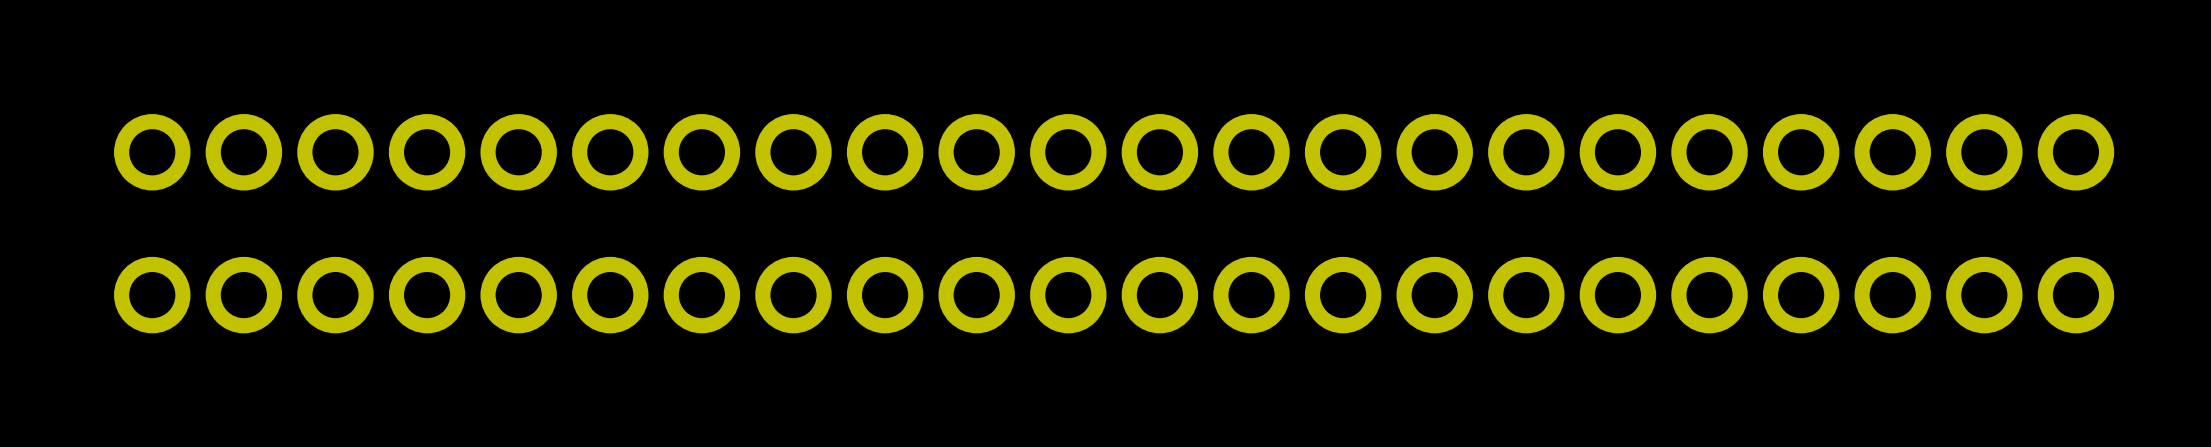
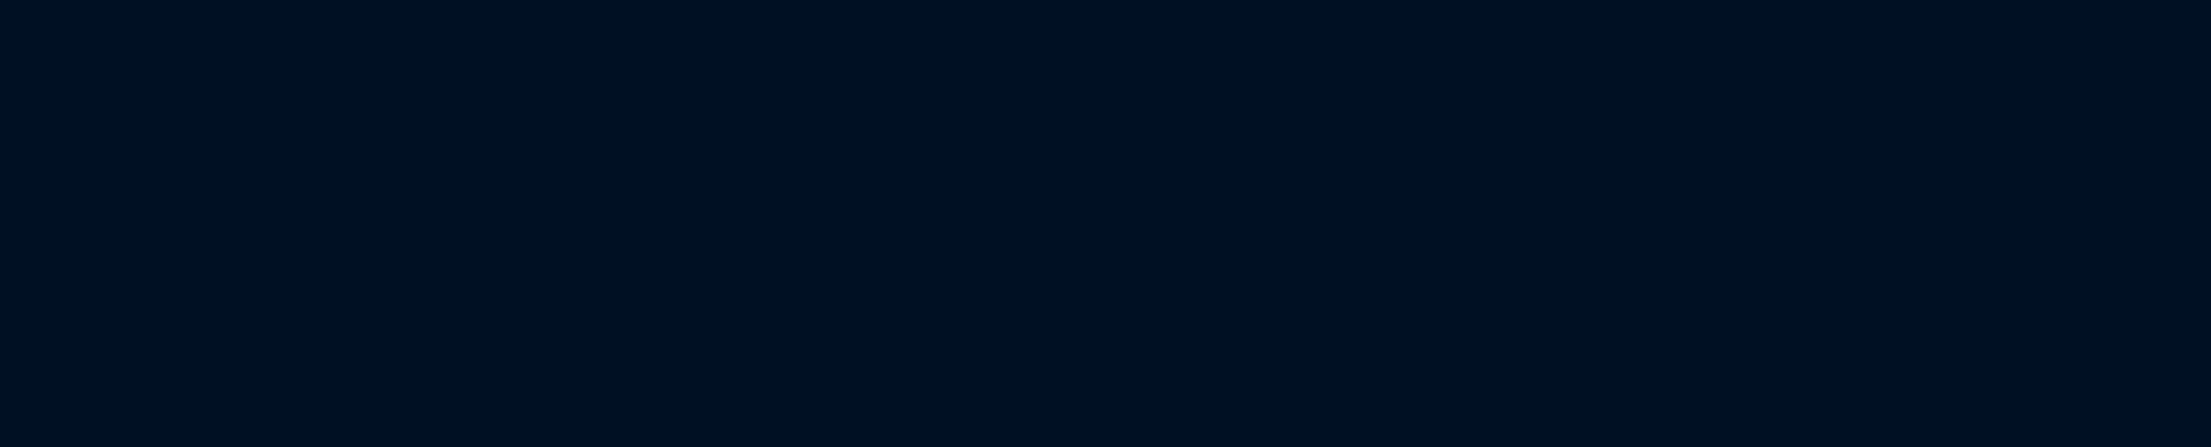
part: (1114, 223) -> none

